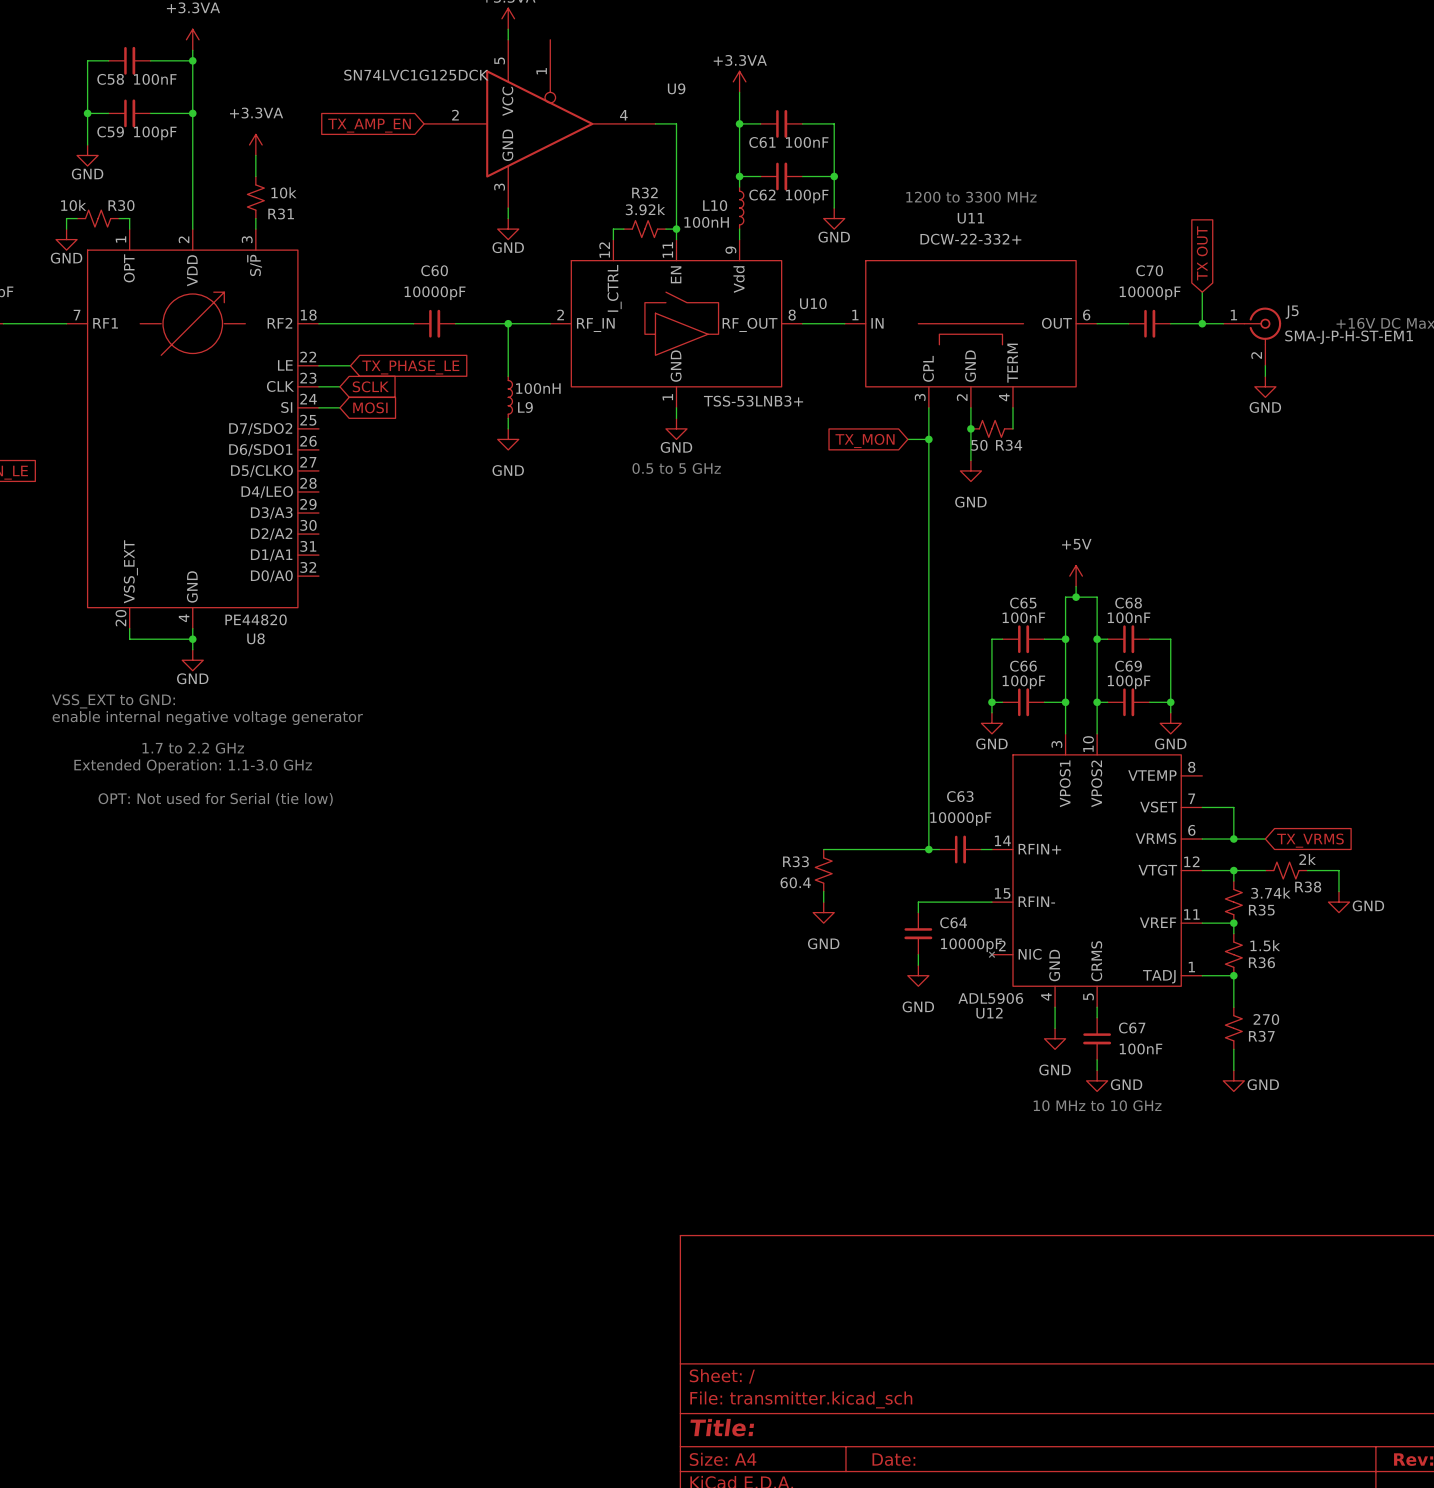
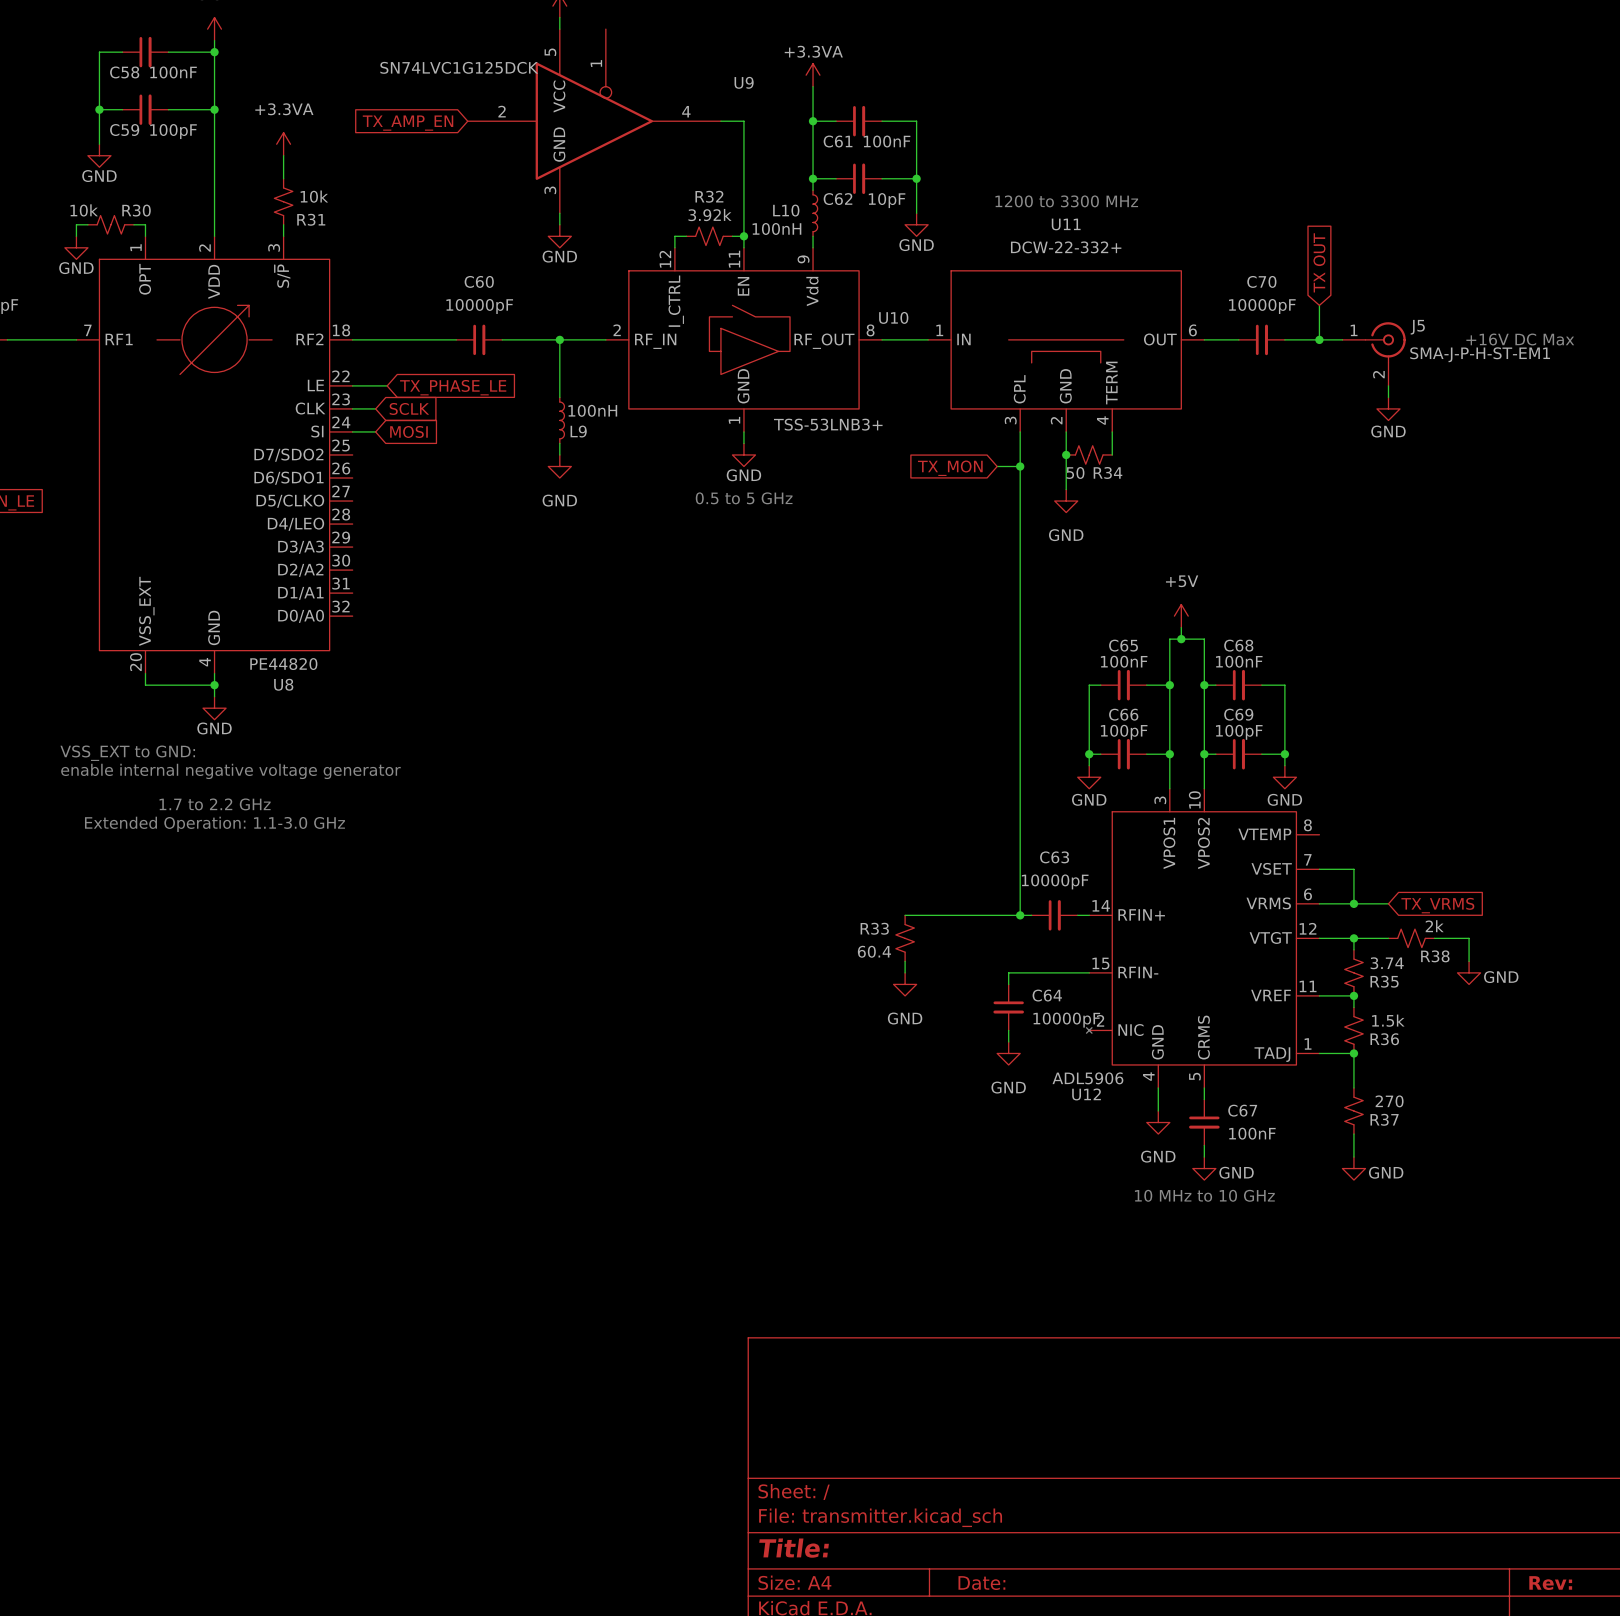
C62 value: 100pF (807, 196) -> 10pF (887, 200)
text: OPT: Not used for Serial (tie low) (215, 799) -> none
R35 value: 3.74k (1270, 893) -> 3.74 (1387, 963)

